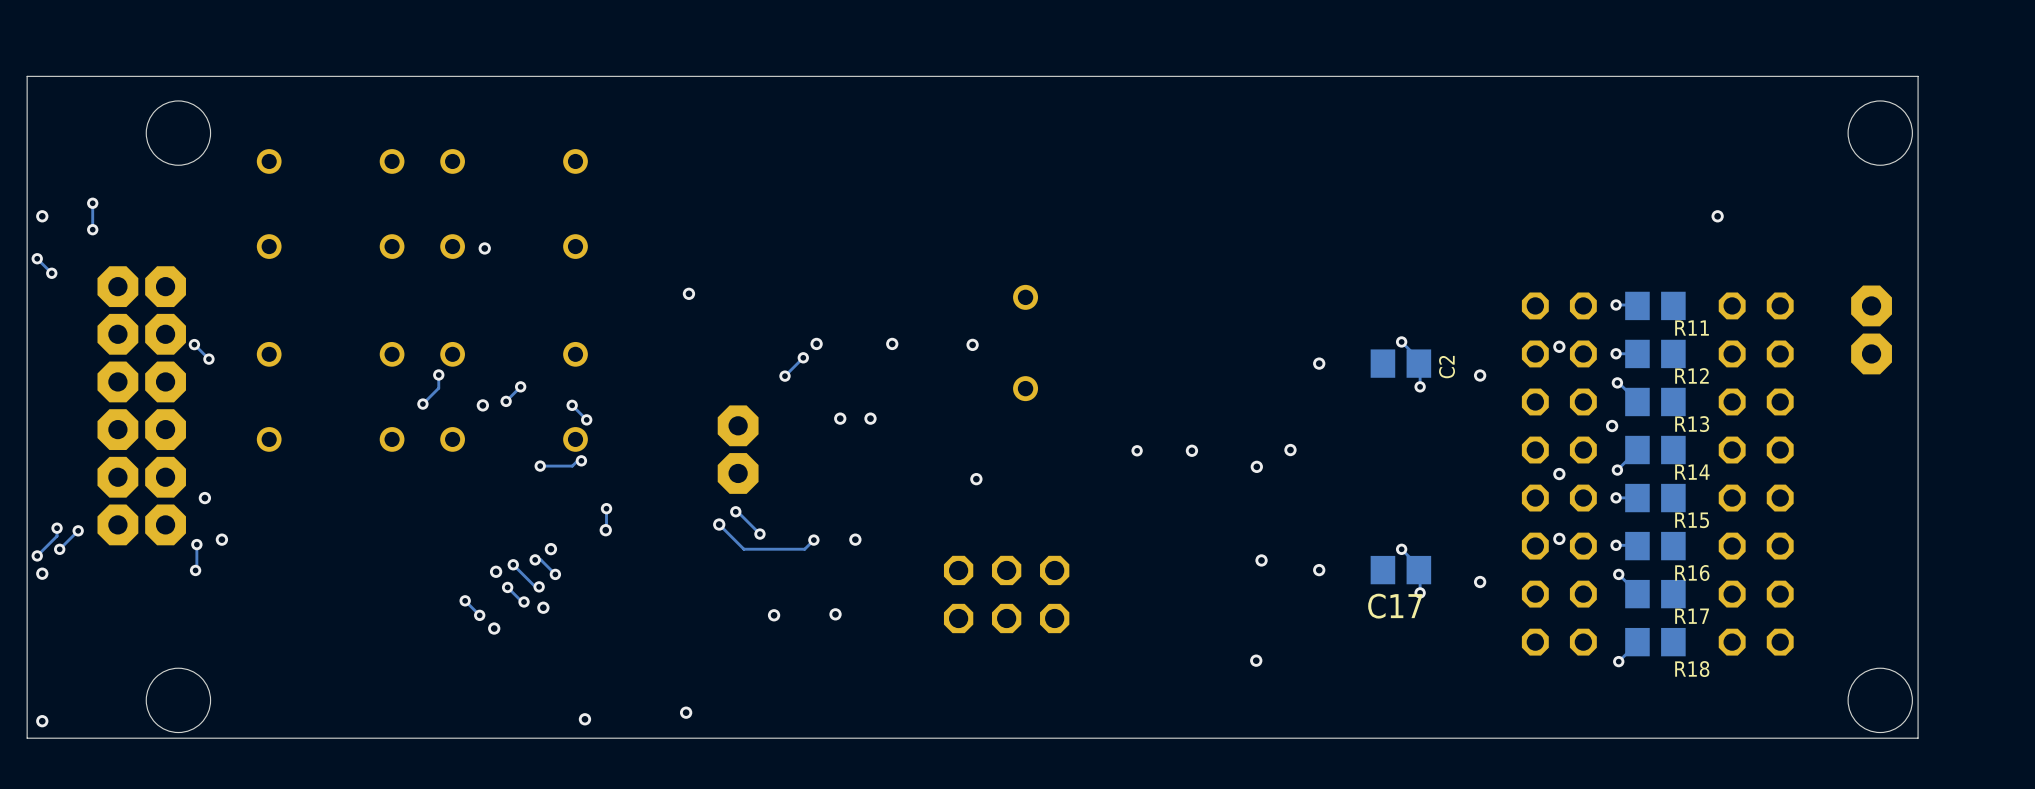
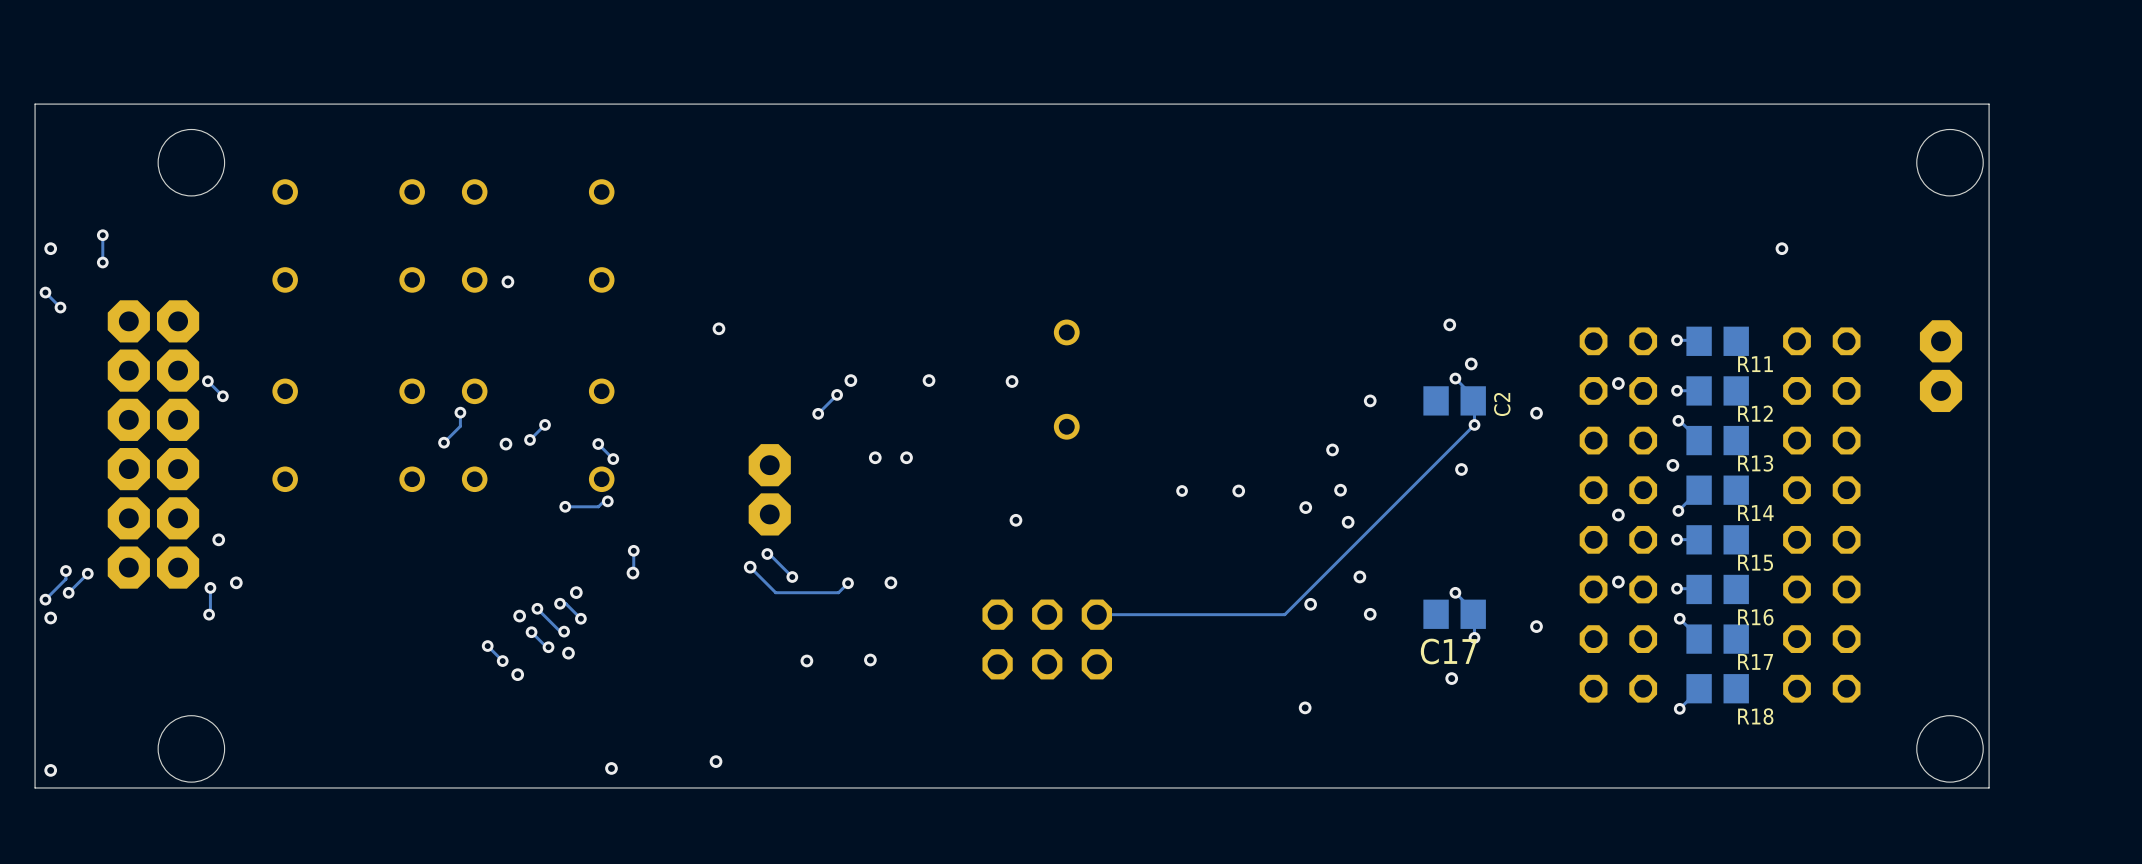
via: none -> (1449, 324)
via: none -> (1471, 363)
track: none -> (1474, 424) (1284, 614) (1096, 614)
via: none -> (1332, 449)
via: none -> (1461, 469)
via: none -> (1348, 522)
via: none -> (1359, 576)
via: none -> (1451, 678)

